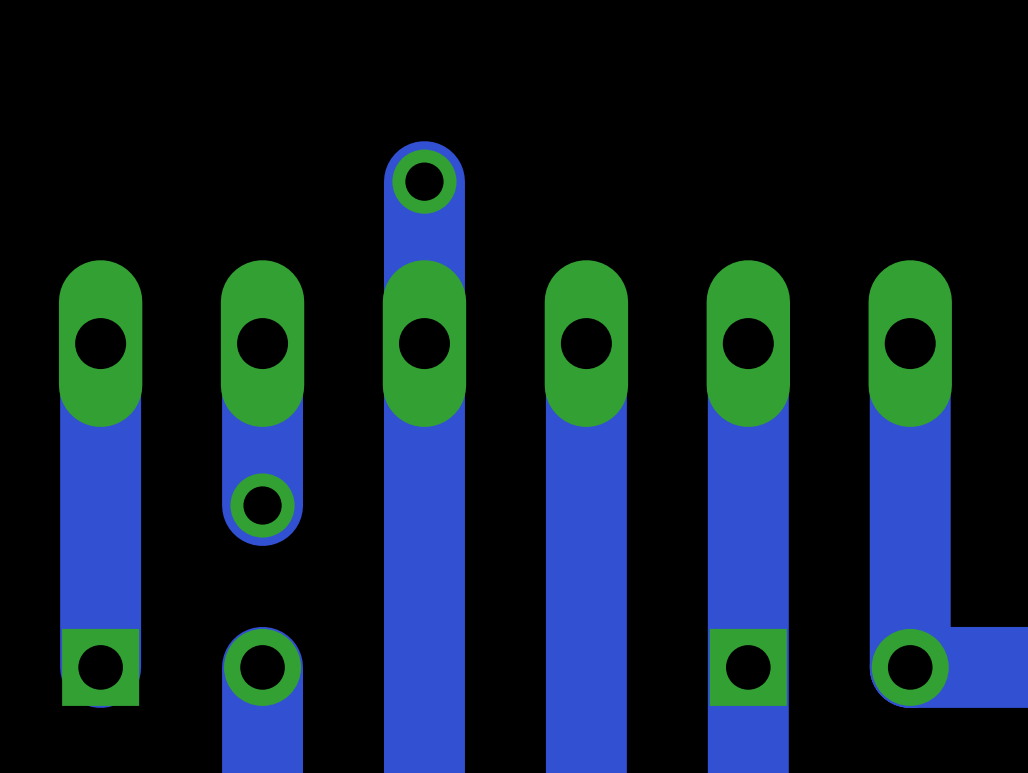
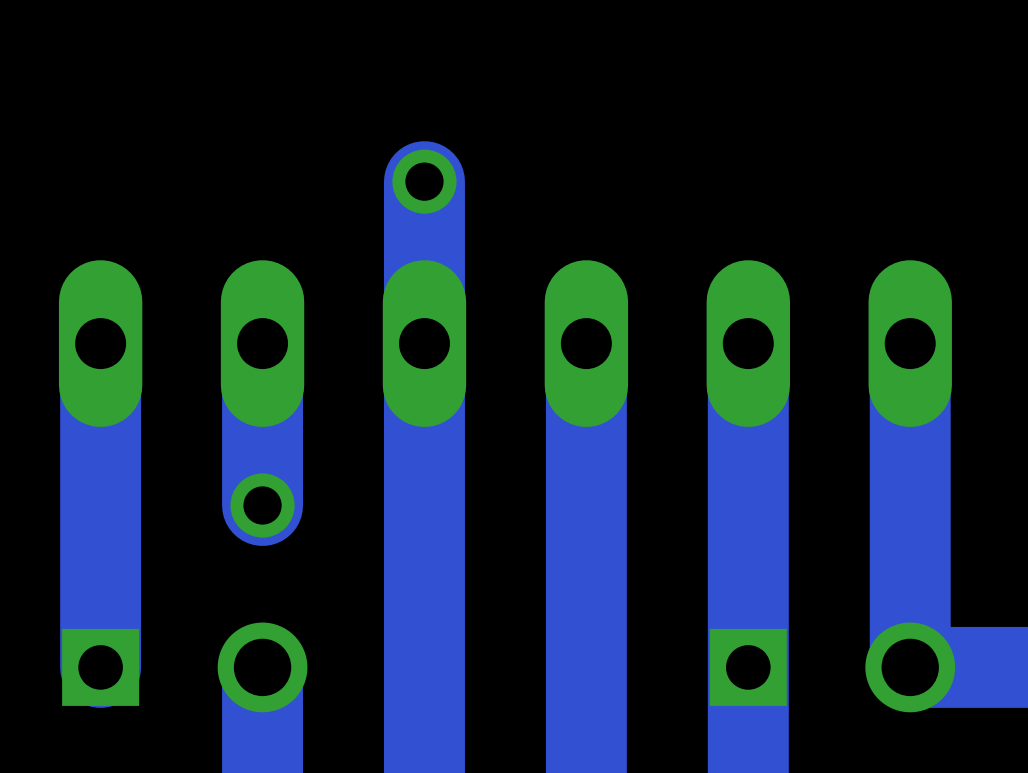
part footprint: [62, 628, 302, 706] -> [62, 622, 308, 713]
part footprint: [709, 628, 949, 706] -> [709, 622, 956, 713]

